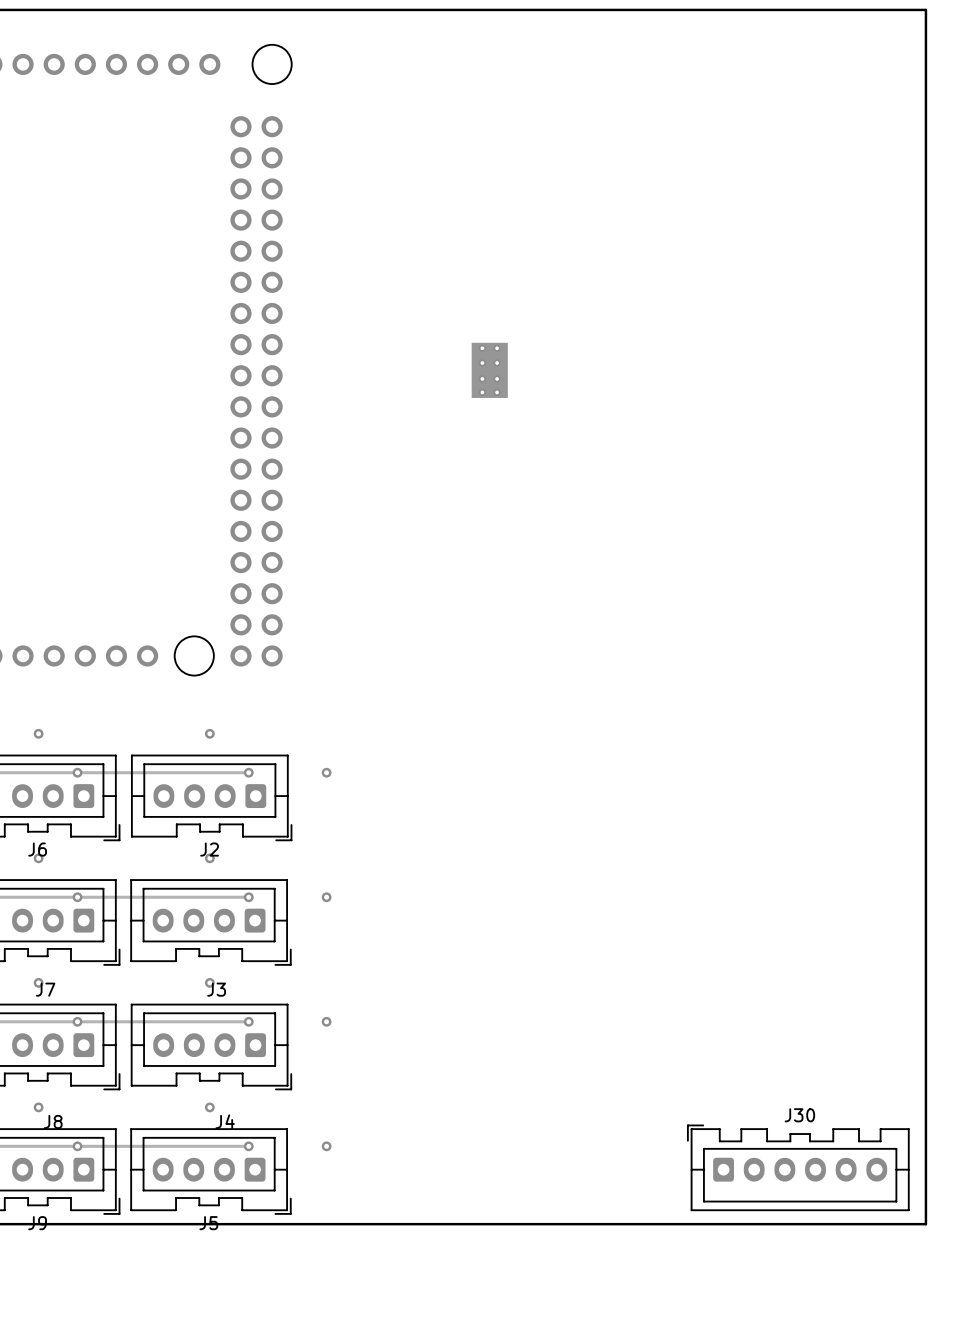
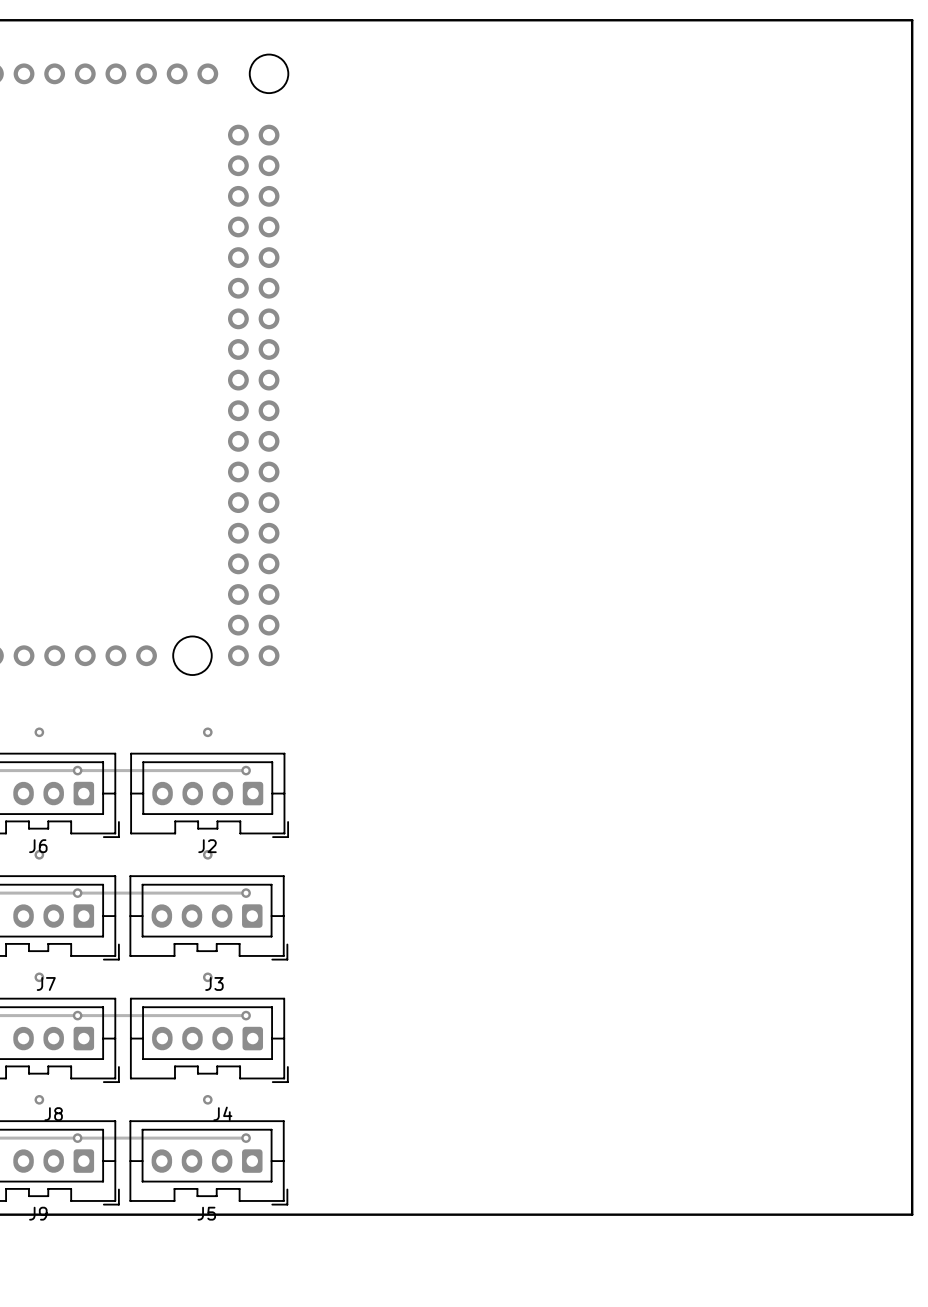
part: (489, 370) -> none
via: (326, 772) -> none
via: (326, 897) -> none
via: (326, 1021) -> none
via: (326, 1146) -> none
J30: (798, 1167) -> none

